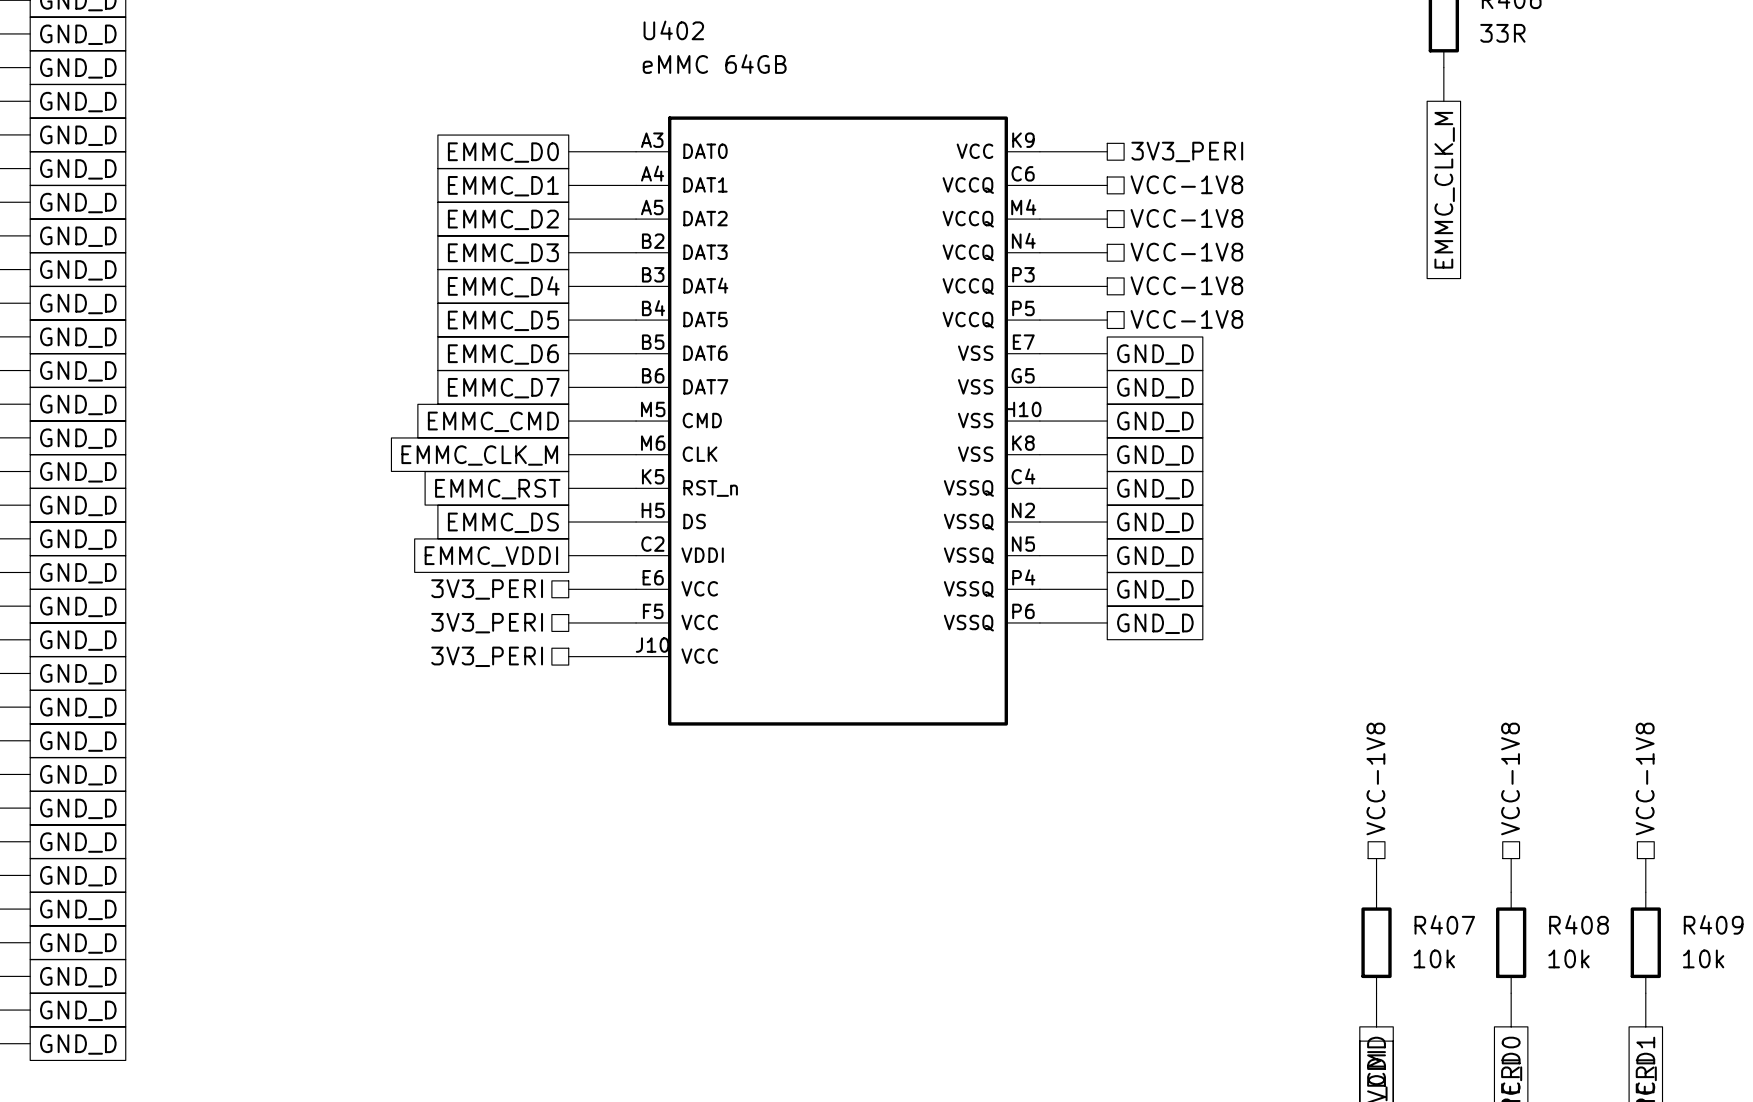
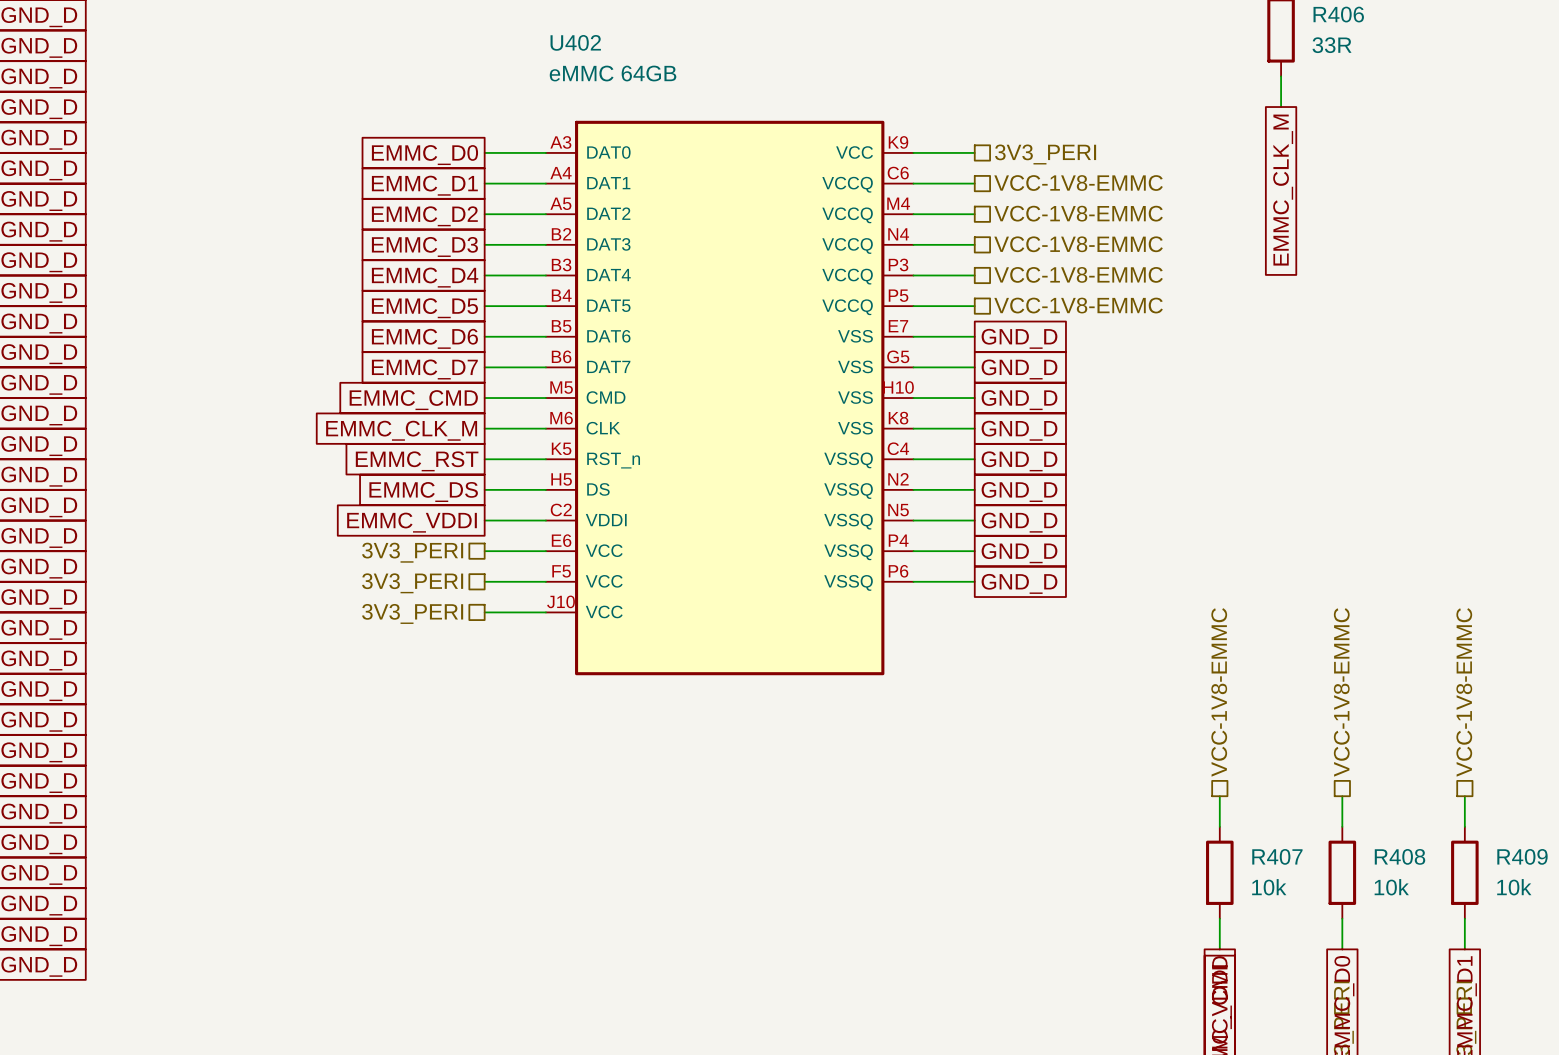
hierarchical label: VCC-1V8 (1186, 184) -> VCC-1V8-EMMC (1078, 183)
hierarchical label: VCC-1V8 (1186, 218) -> VCC-1V8-EMMC (1078, 213)
hierarchical label: VCC-1V8 (1186, 252) -> VCC-1V8-EMMC (1078, 244)
hierarchical label: VCC-1V8 (1186, 285) -> VCC-1V8-EMMC (1078, 274)
hierarchical label: VCC-1V8 (1186, 319) -> VCC-1V8-EMMC (1078, 305)
hierarchical label: VCC-1V8 (1375, 778) -> VCC-1V8-EMMC (1219, 692)
hierarchical label: VCC-1V8 (1510, 778) -> VCC-1V8-EMMC (1341, 692)
hierarchical label: VCC-1V8 (1645, 778) -> VCC-1V8-EMMC (1464, 692)

